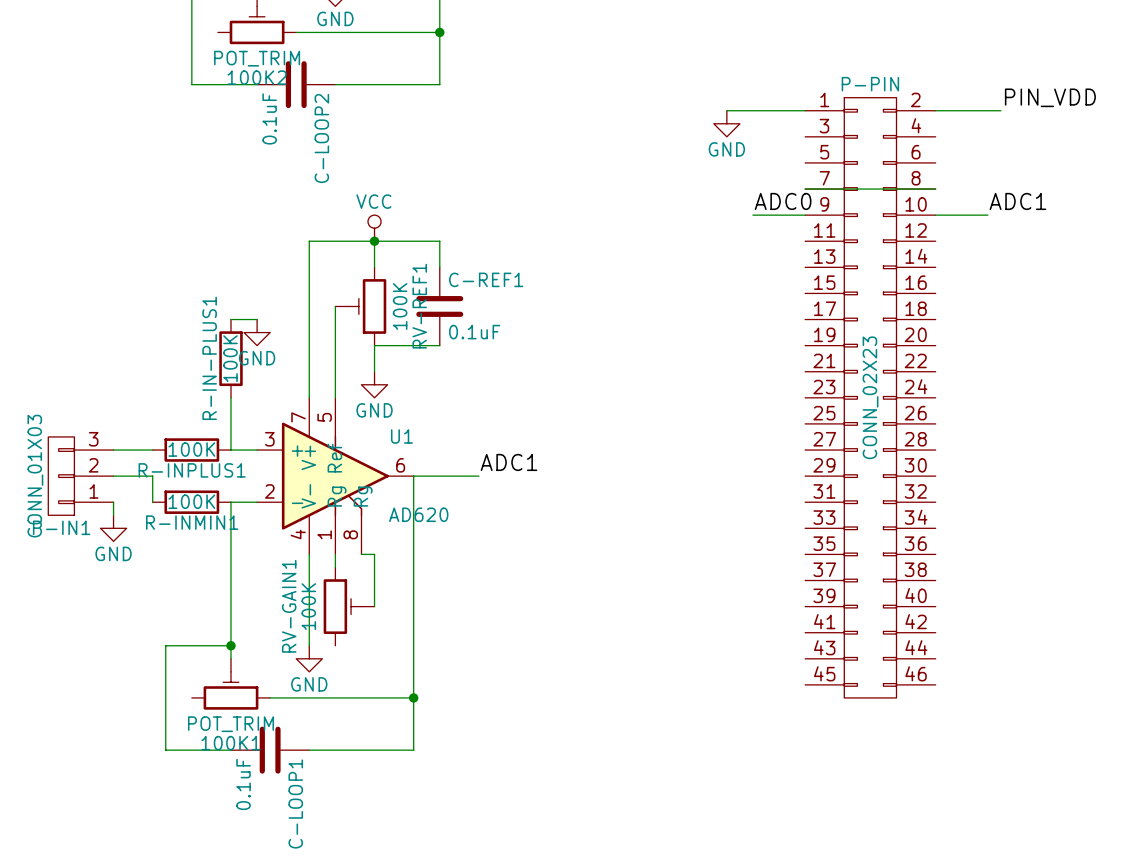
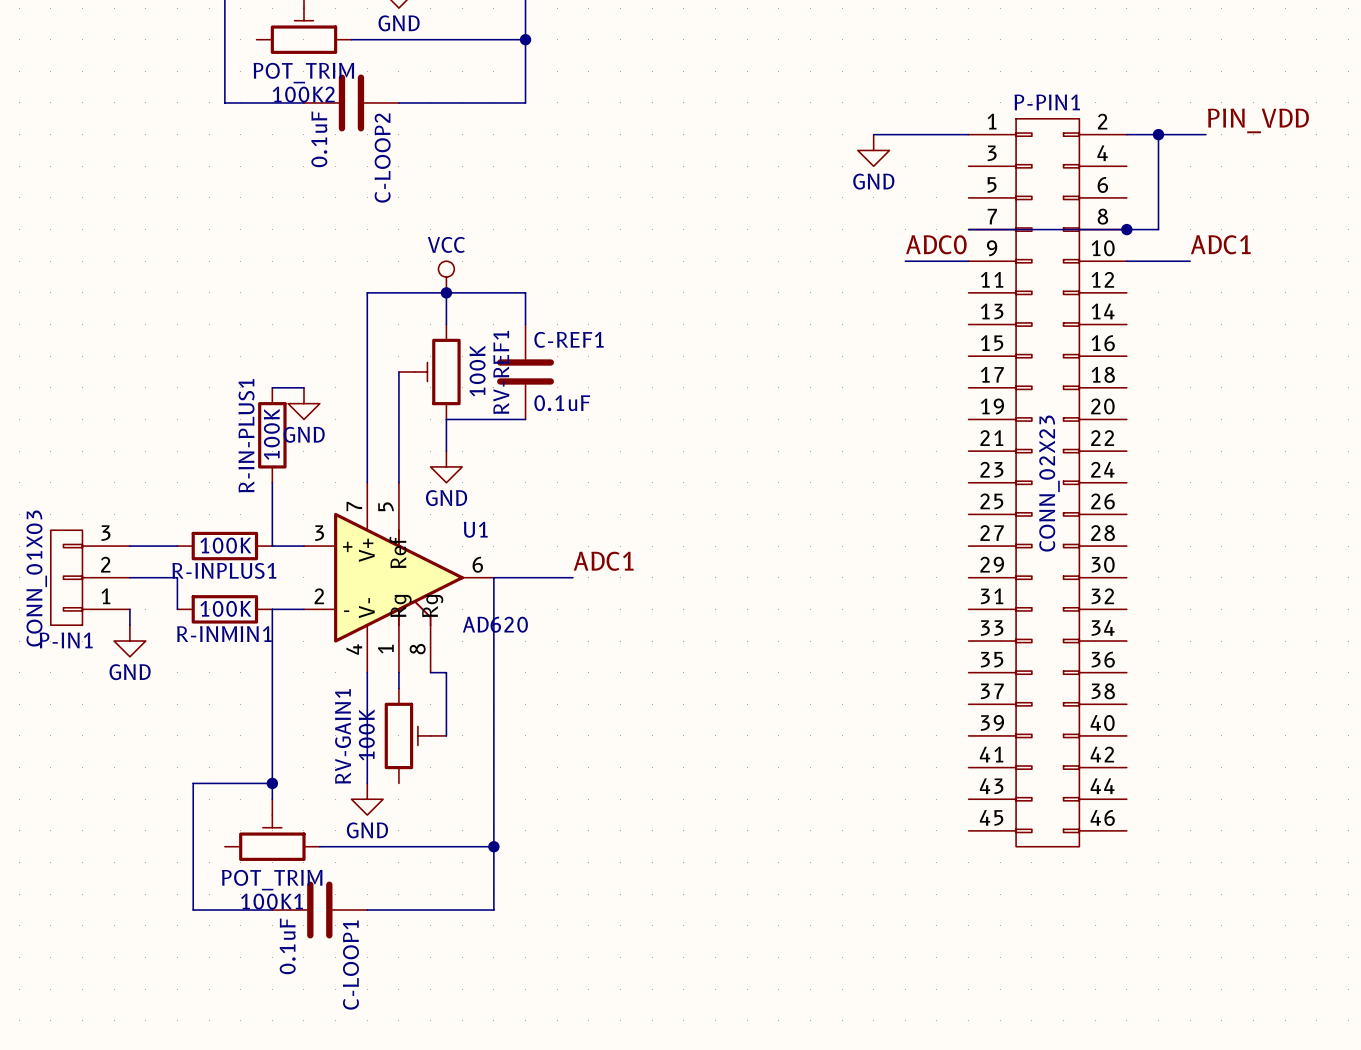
P-PIN name: P-PIN (870, 84) -> P-PIN1 (1047, 102)
wire: none -> (1158, 134) (1158, 229) (1126, 229)
junction: none -> (1158, 134)
junction: none -> (1126, 229)

